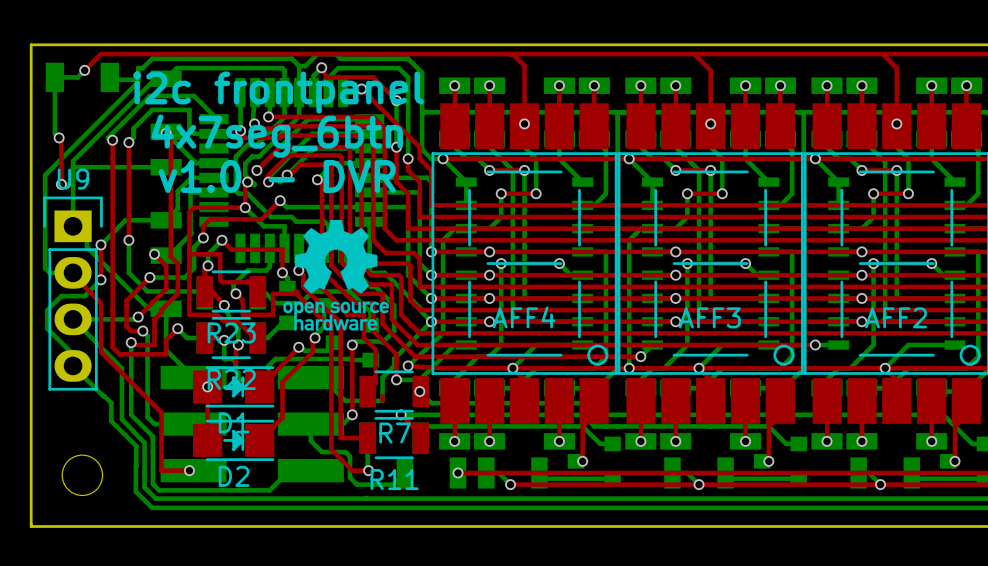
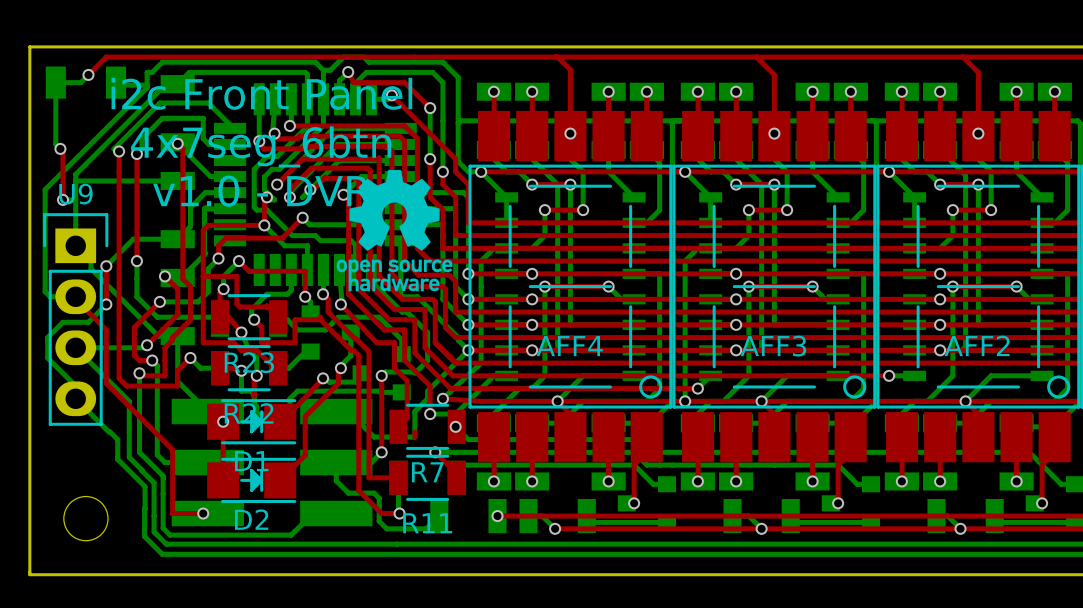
text: i2c frontpanel (278, 92) -> i2c Front Panel (261, 93)
text position: 4x7seg_6btn (277, 136) -> 4x7seg_6btn (261, 146)
text position: v1.0 - DVR (277, 176) -> v1.0 - DVR (261, 191)
drawing position: (336, 275) -> (394, 230)

